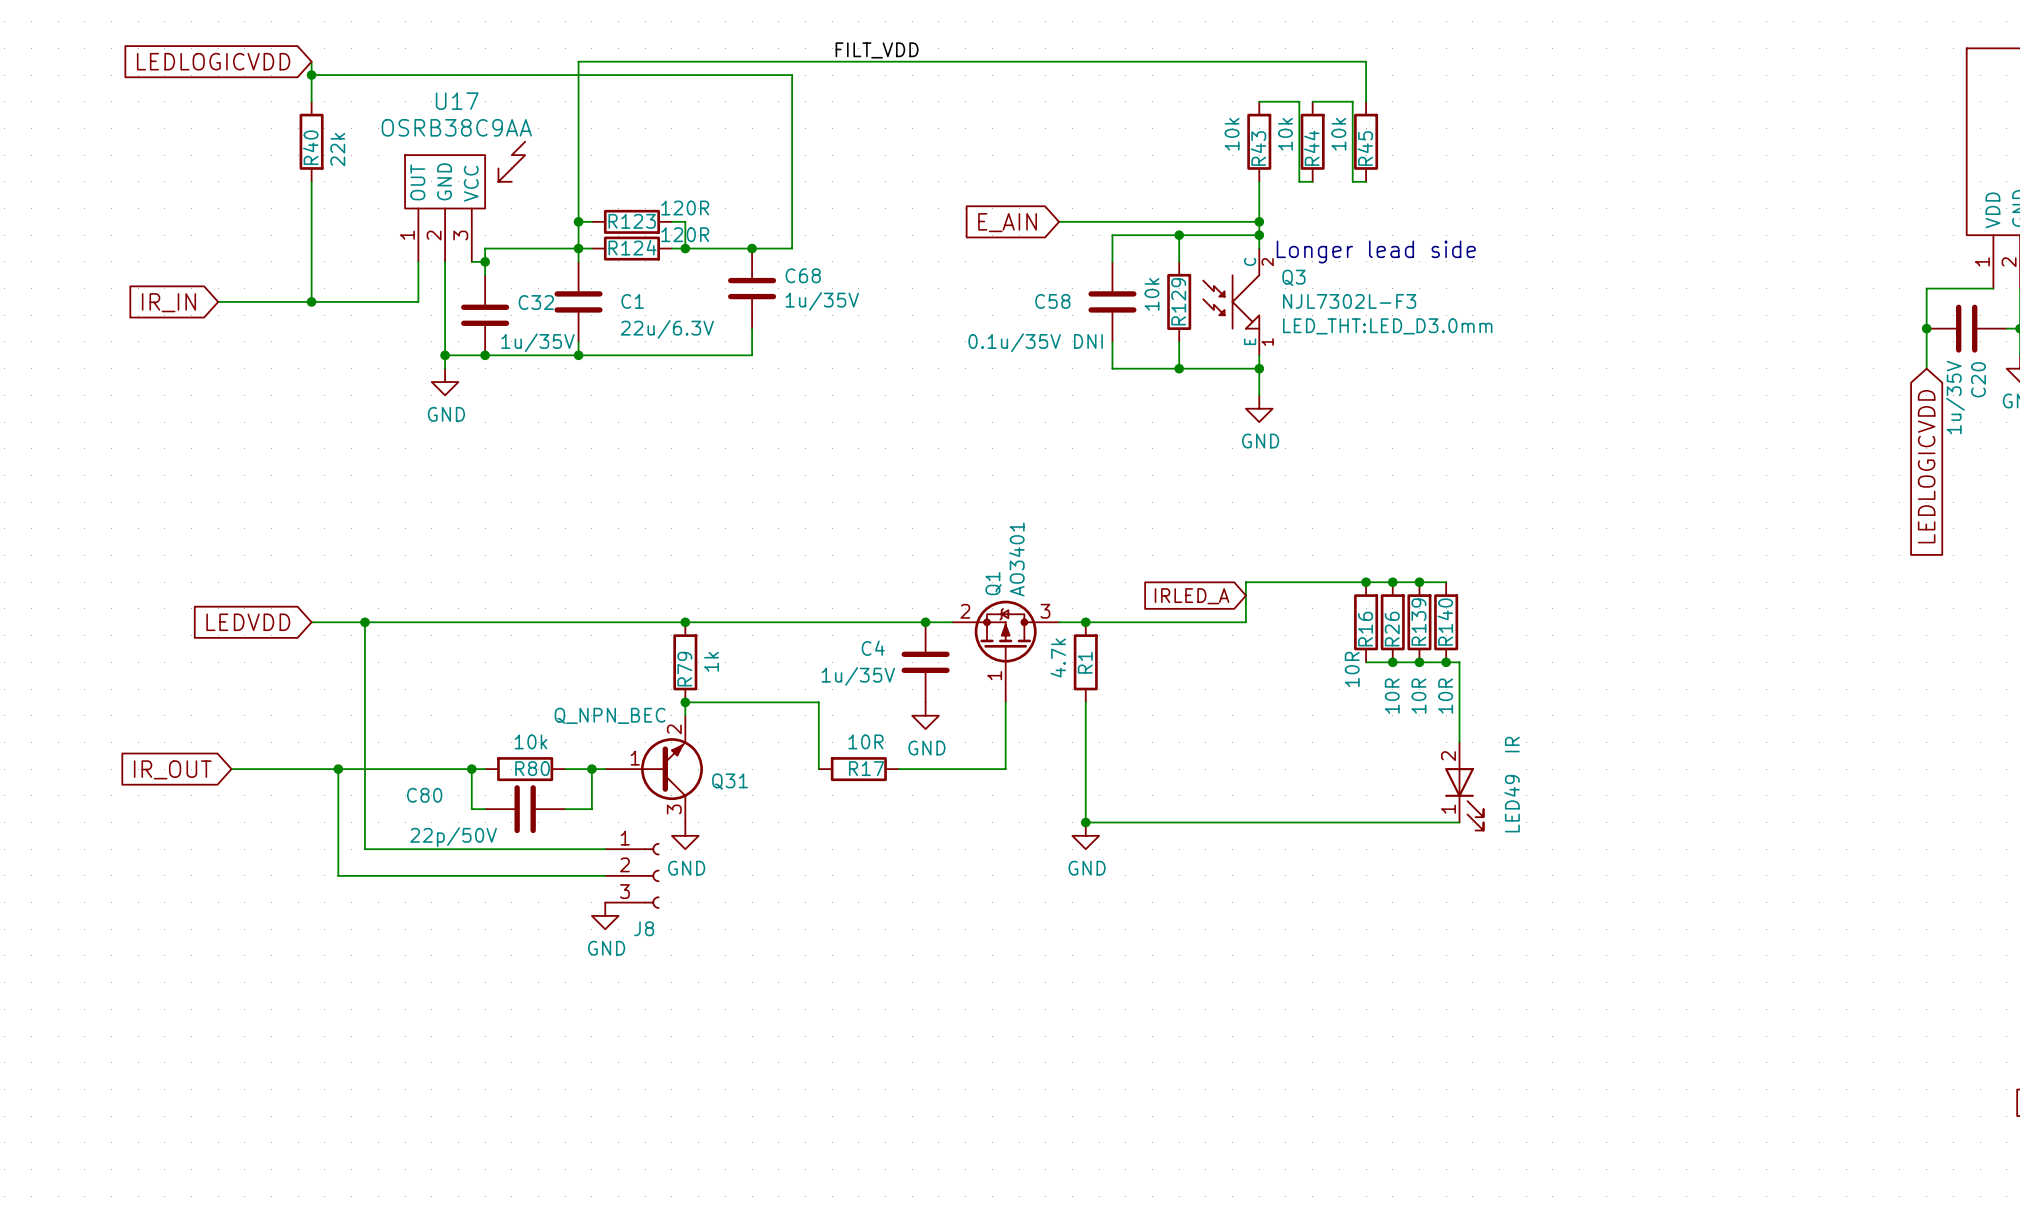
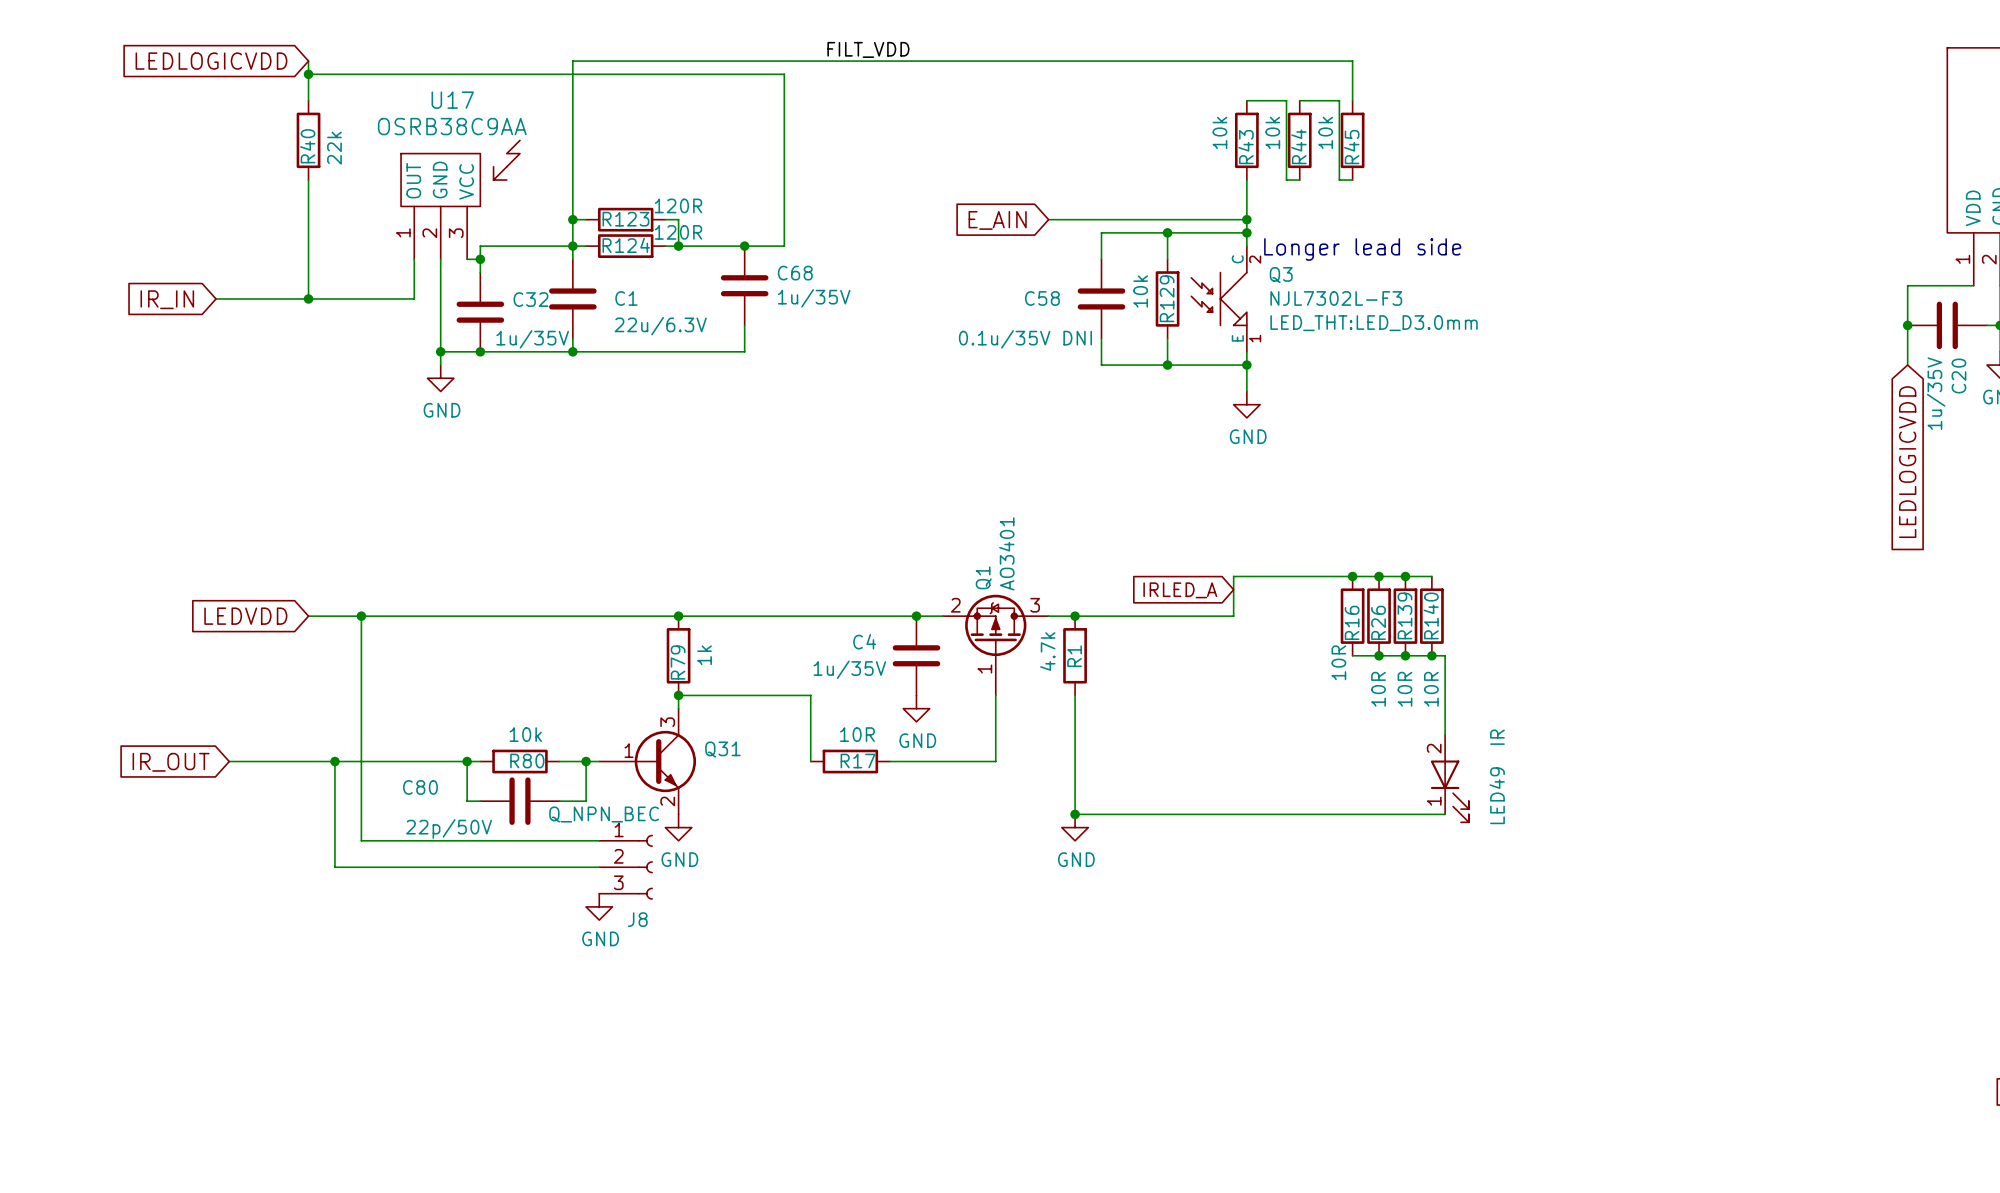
Q31 flip: as is (671, 769) -> up-down (665, 761)

